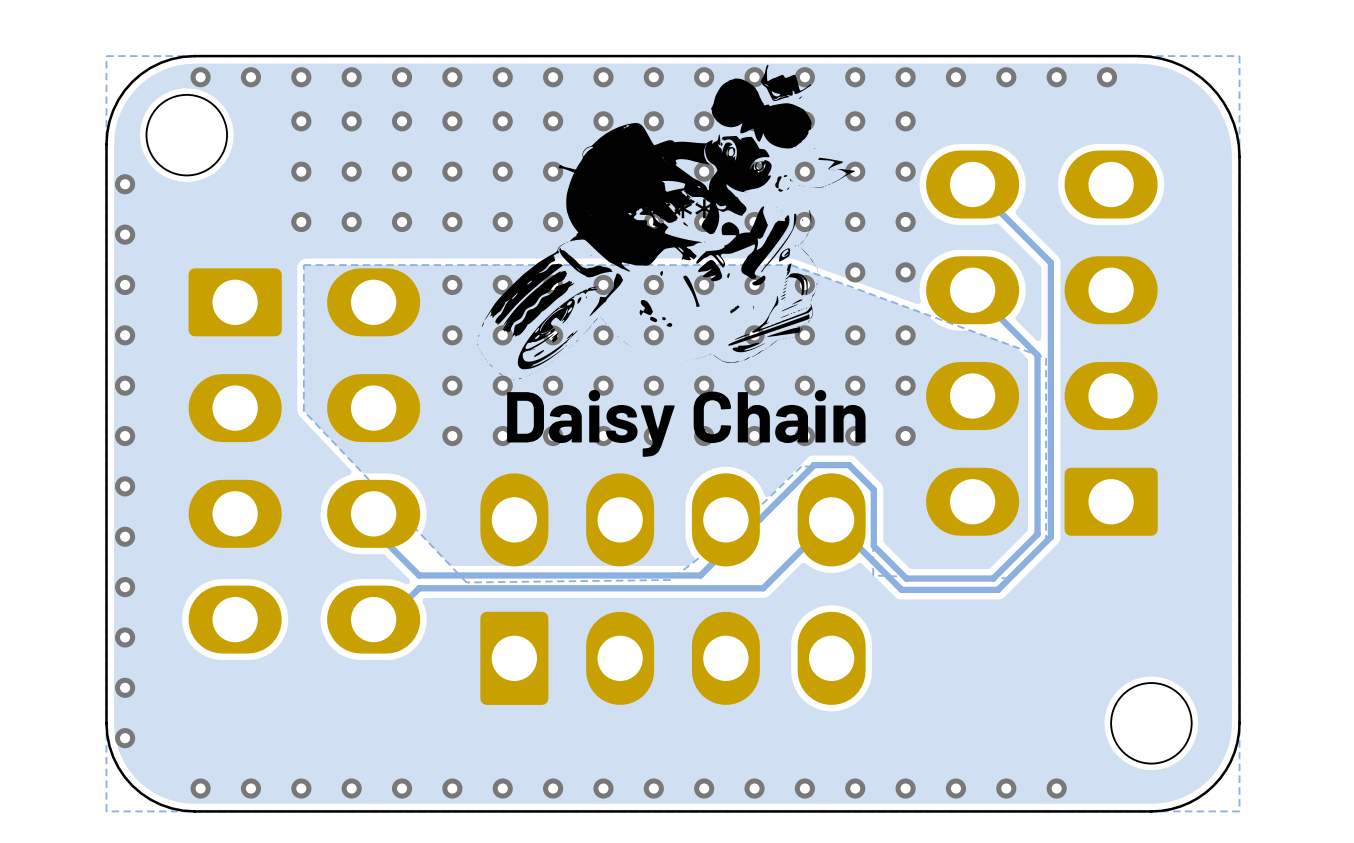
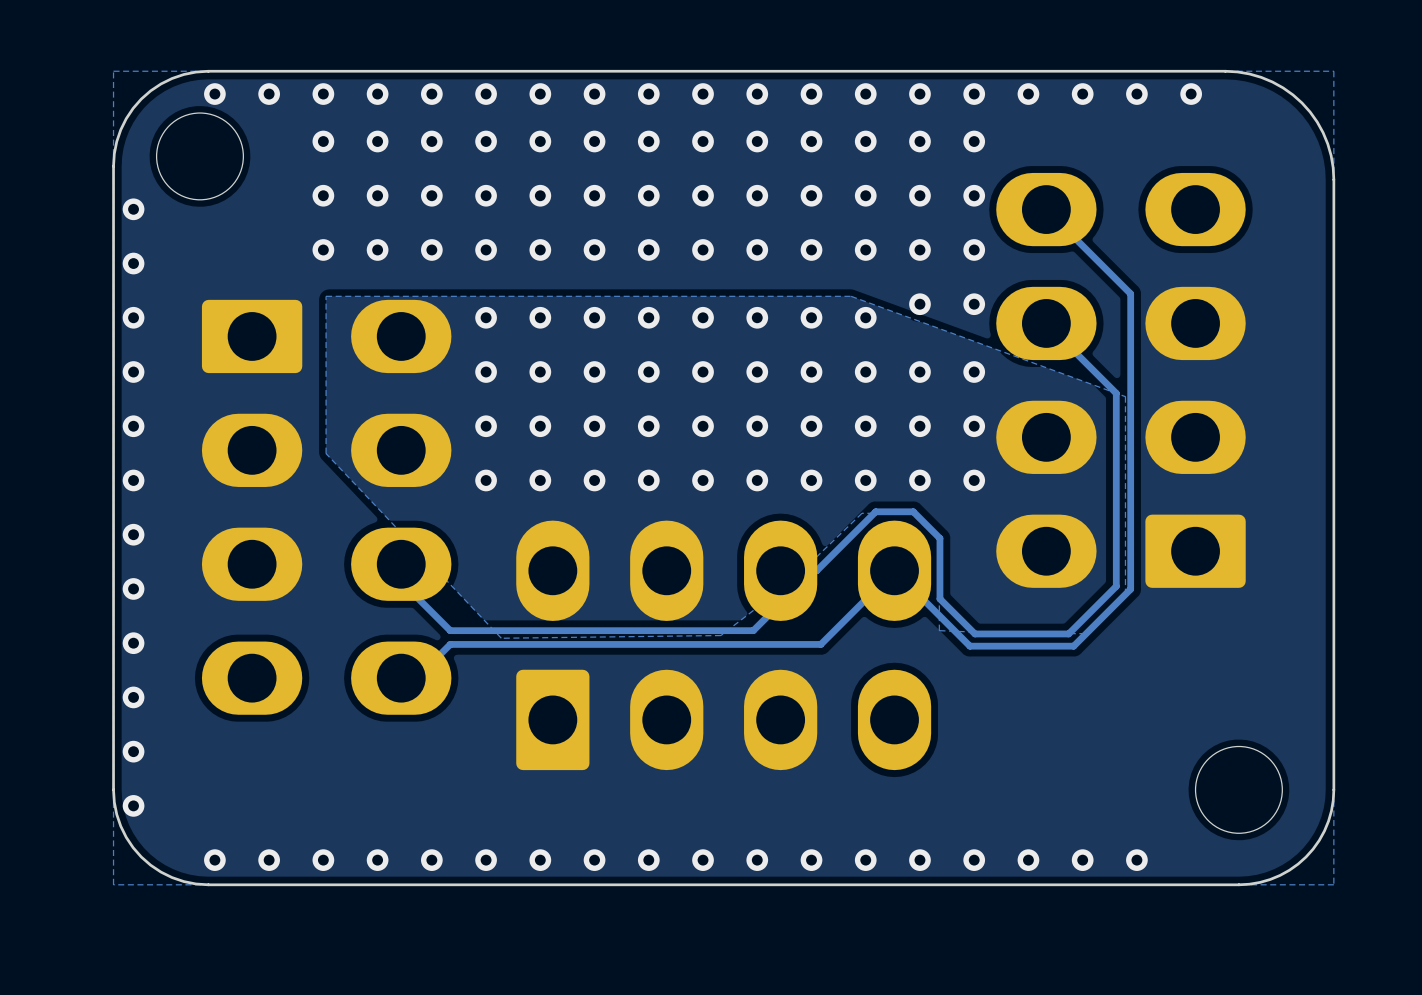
part: (666, 222) -> none
text: Daisy Chain (686, 423) -> none

